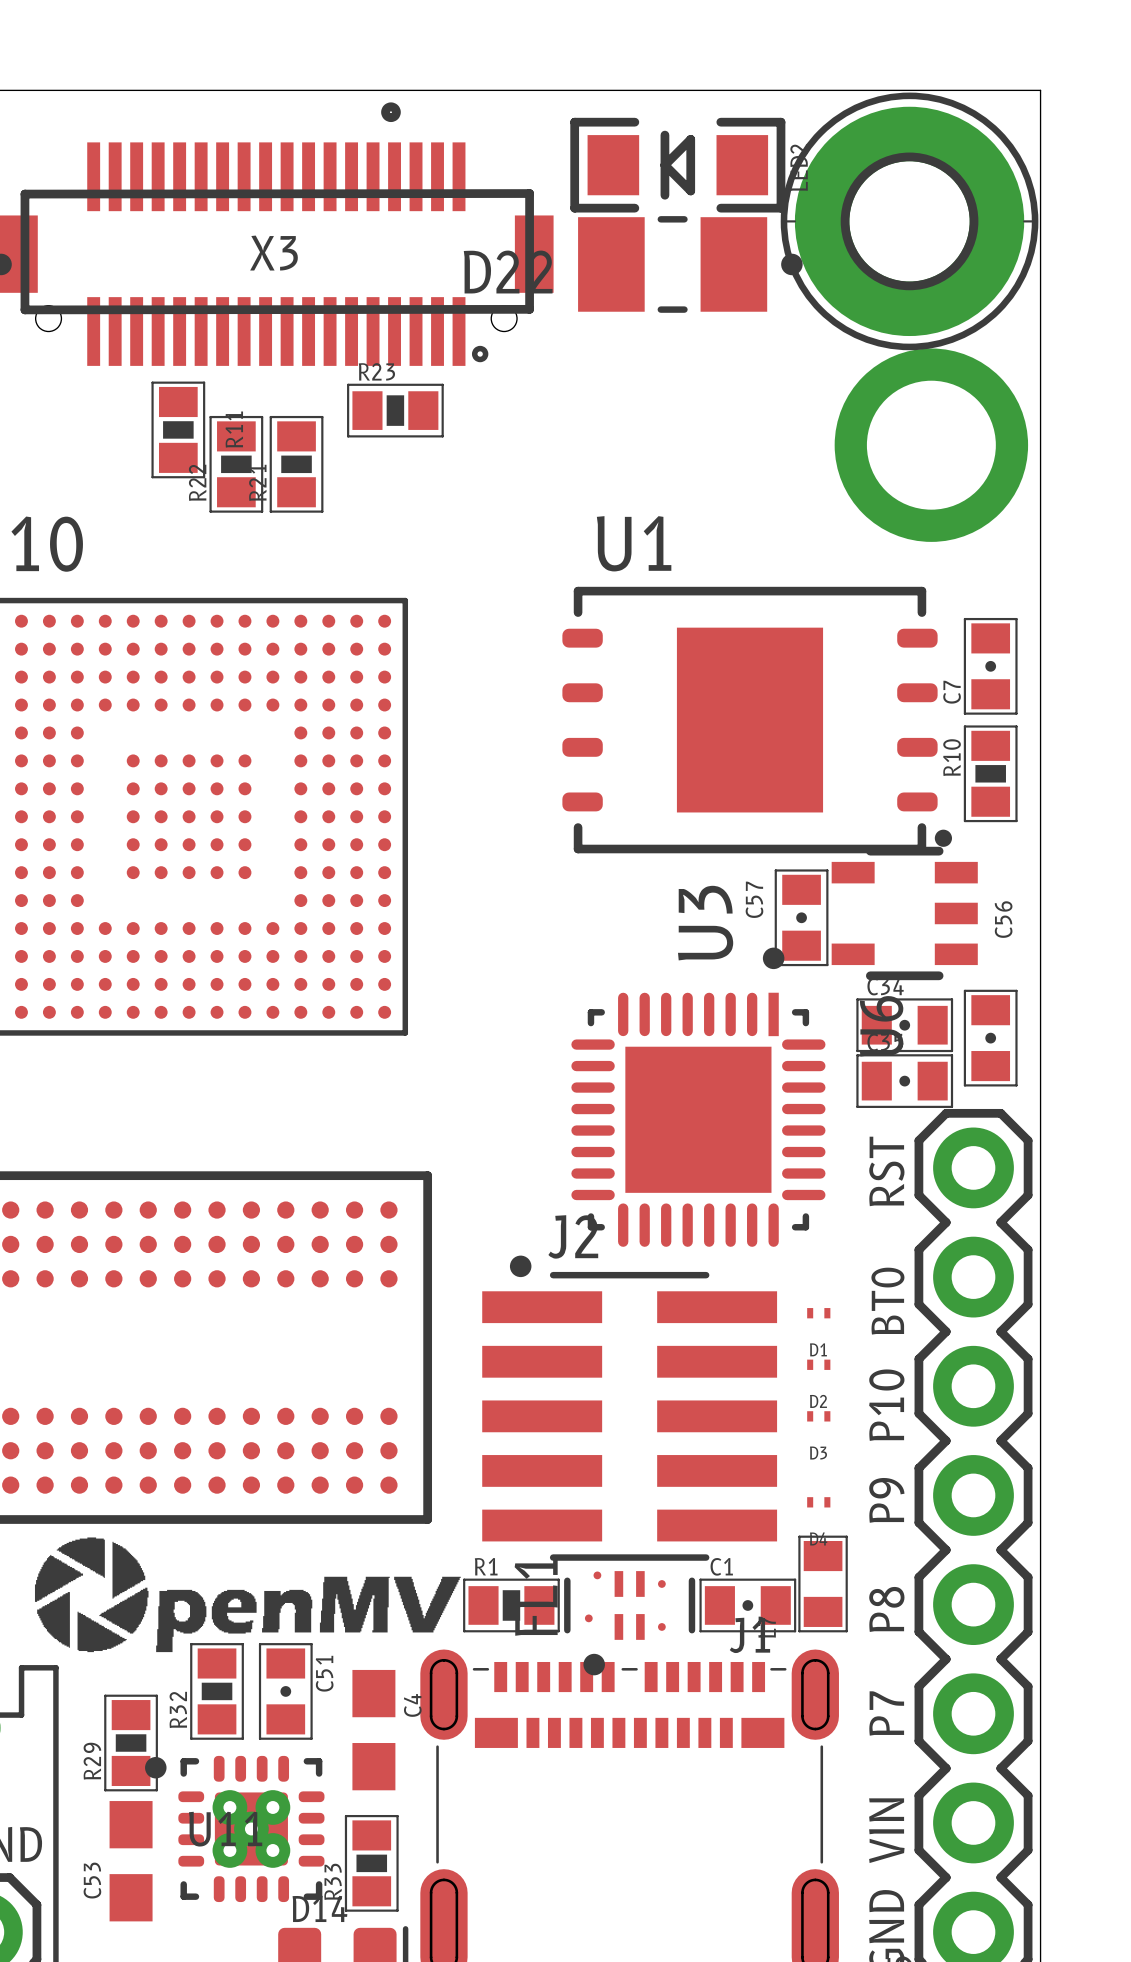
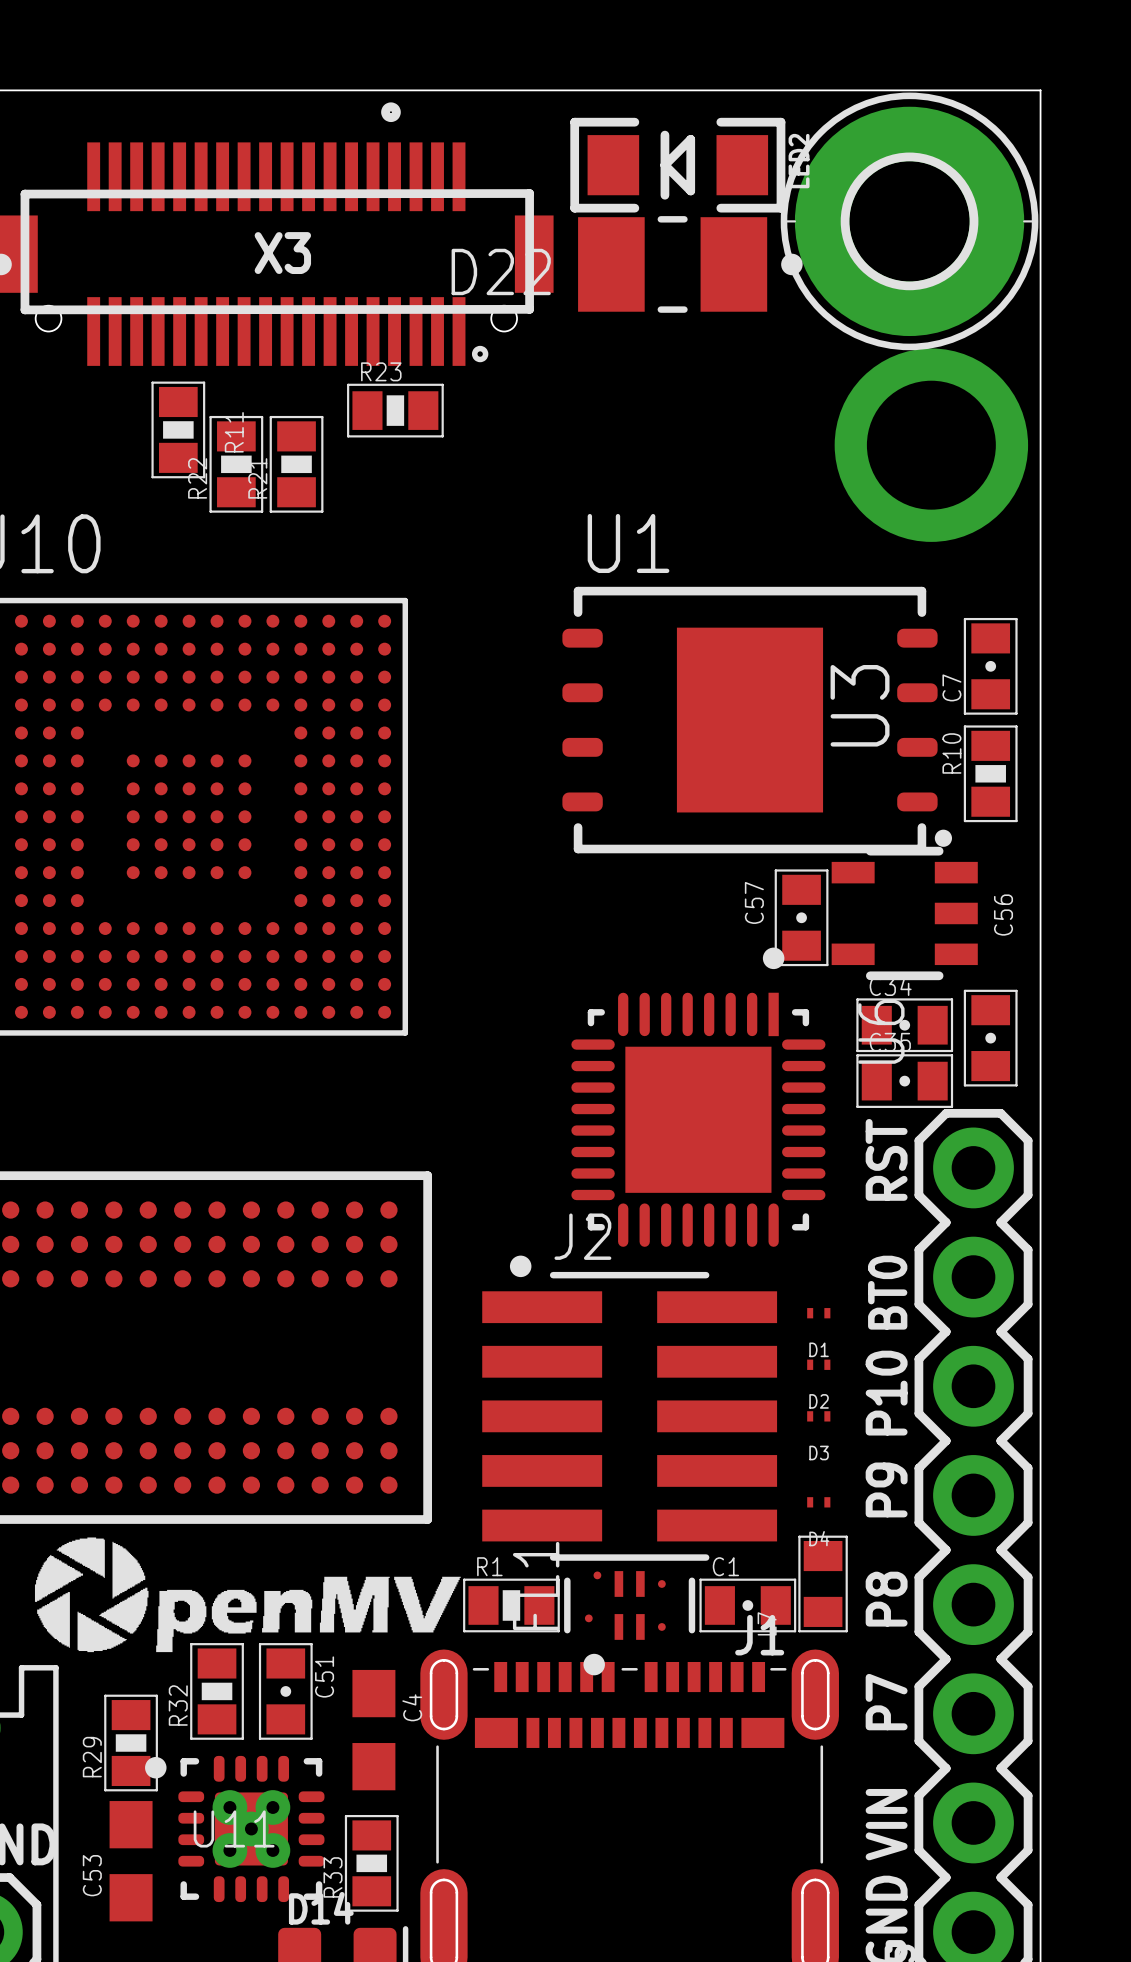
U3 name position: U3 (705, 923) -> U3 (860, 705)

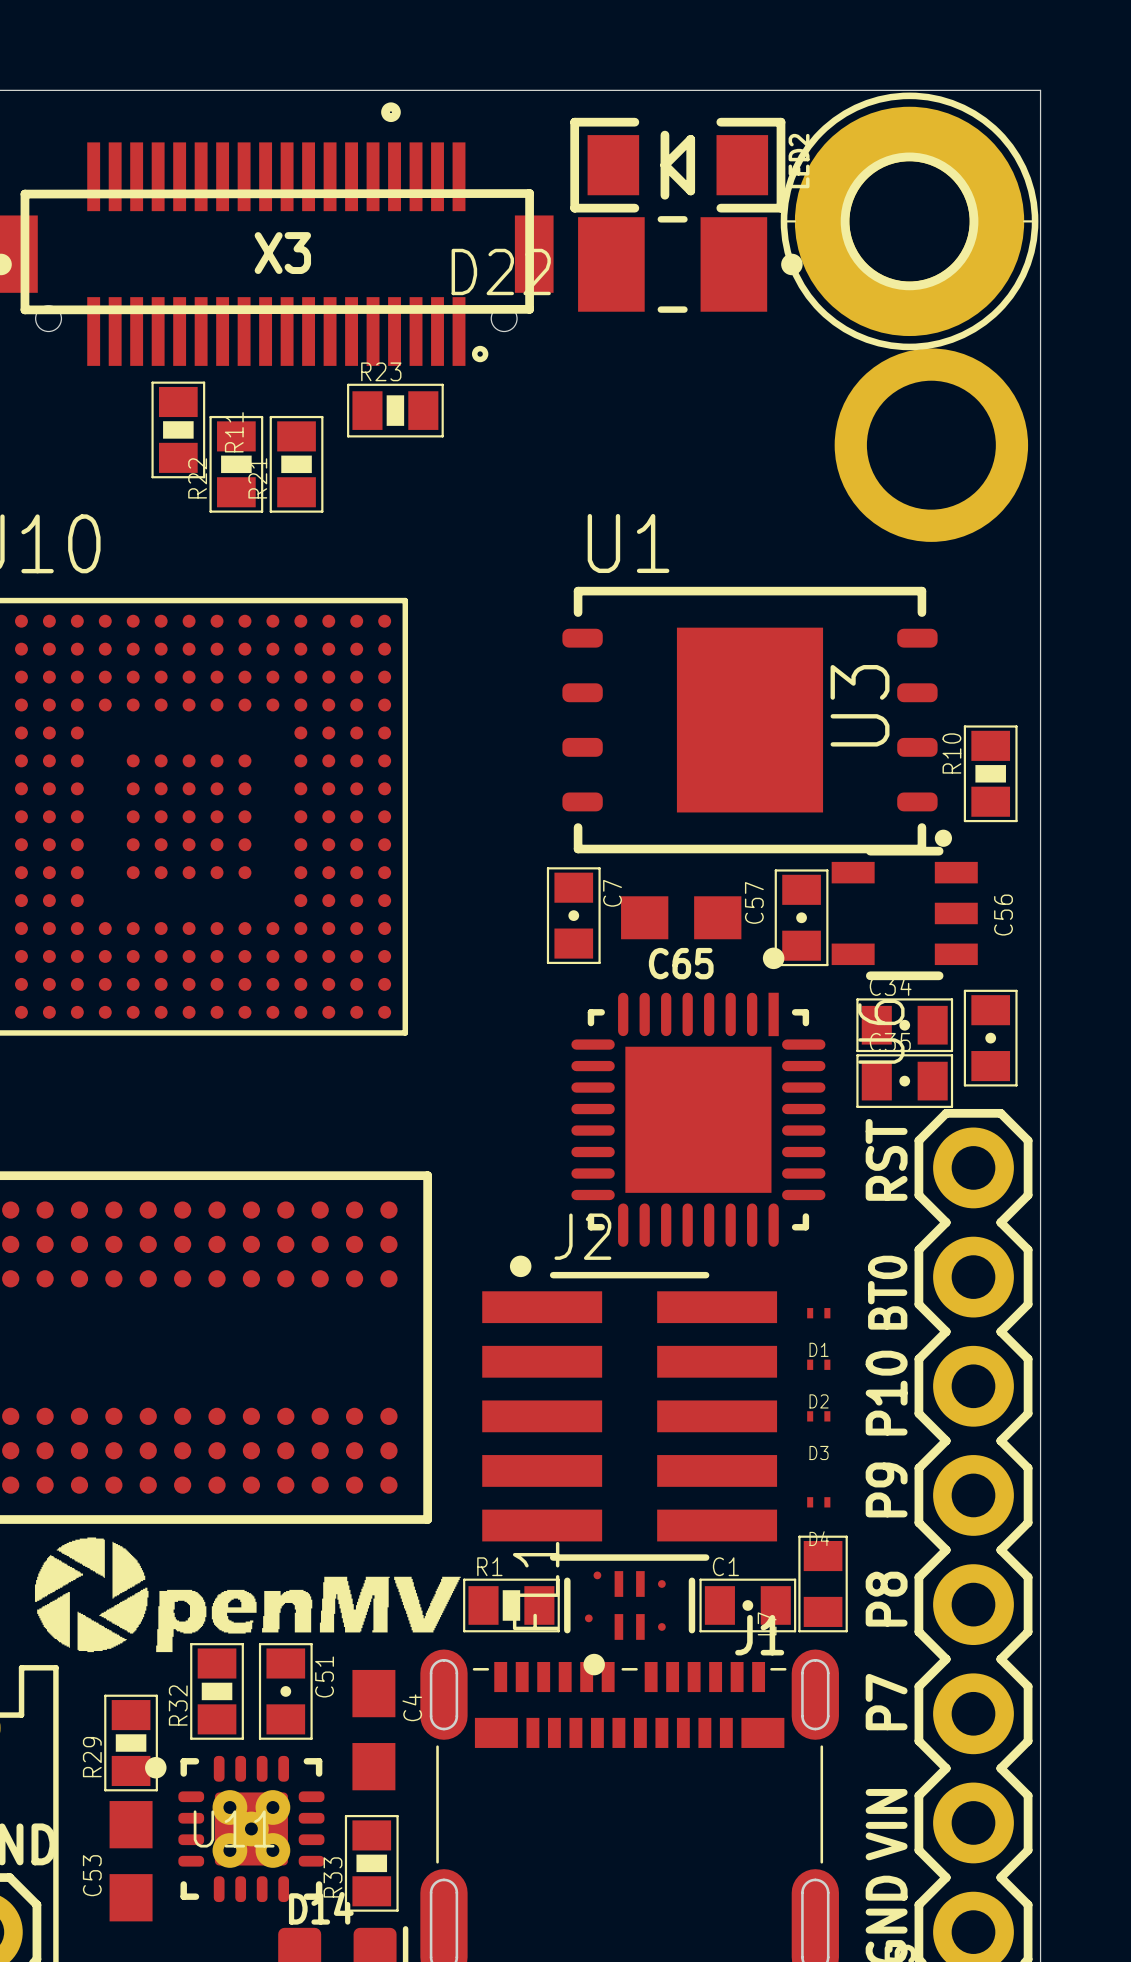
C7 position: (990, 666) -> (573, 915)
C7 name position: C7 (951, 687) -> C7 (612, 893)
C65: none -> (681, 917)

